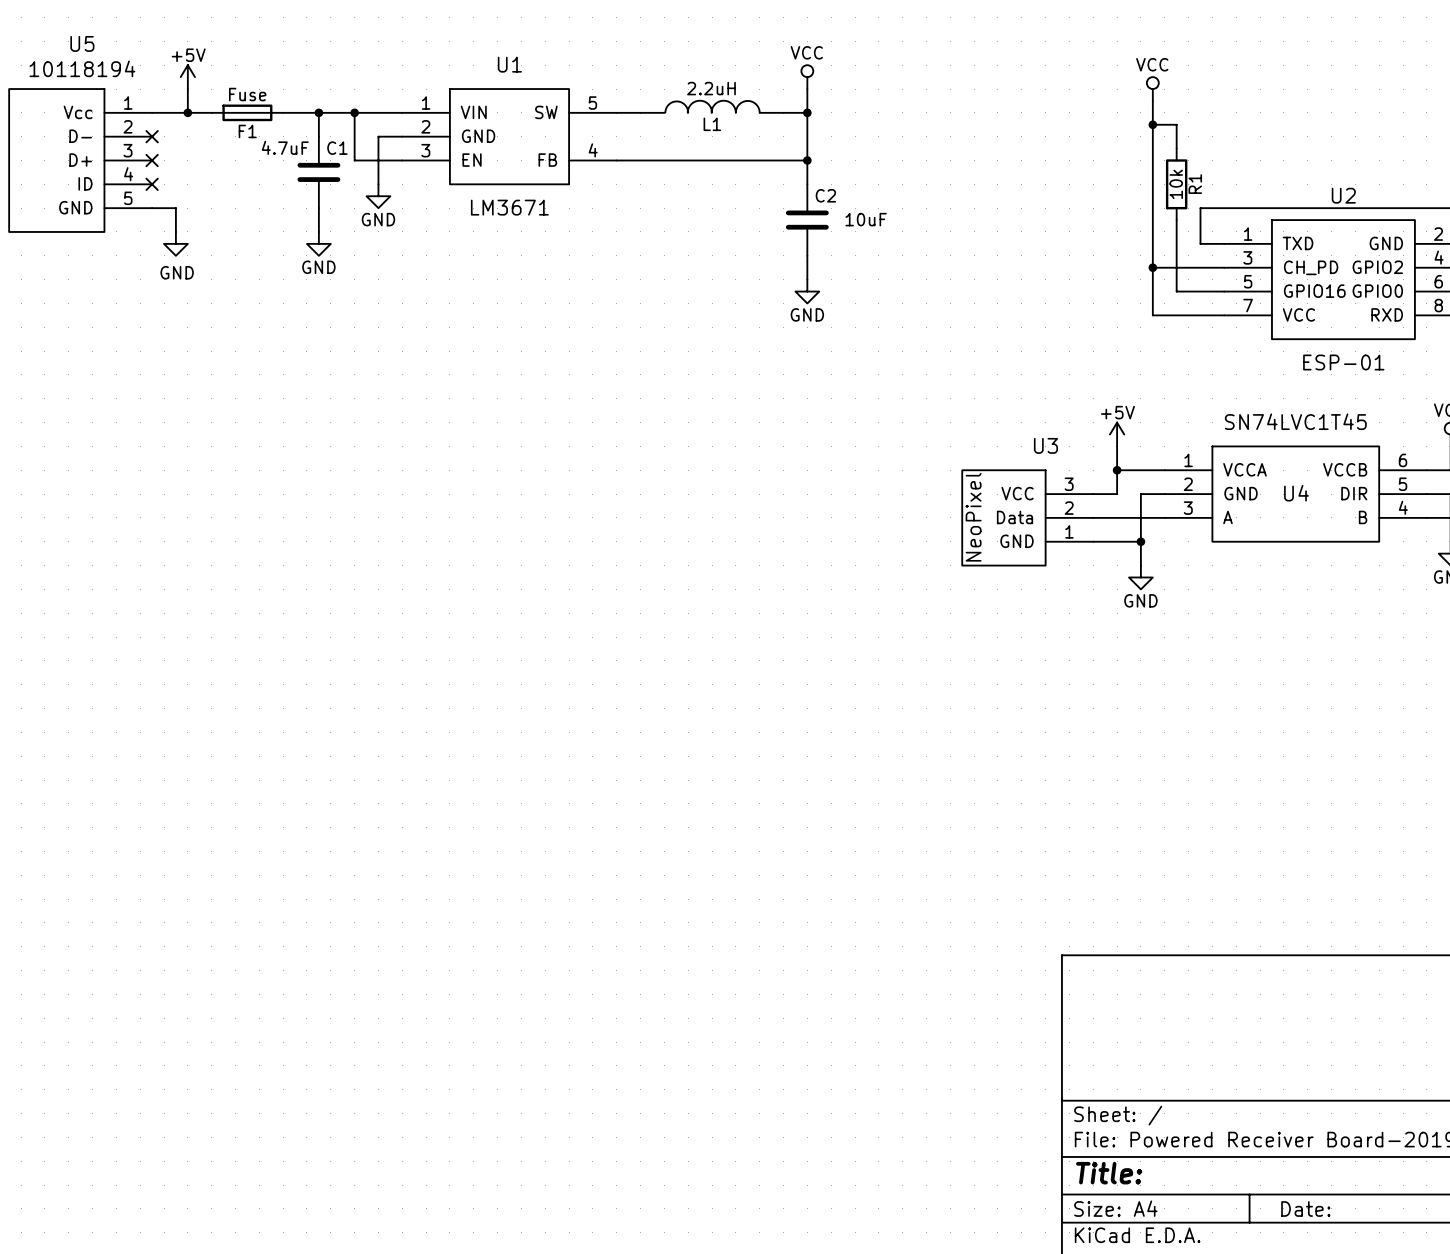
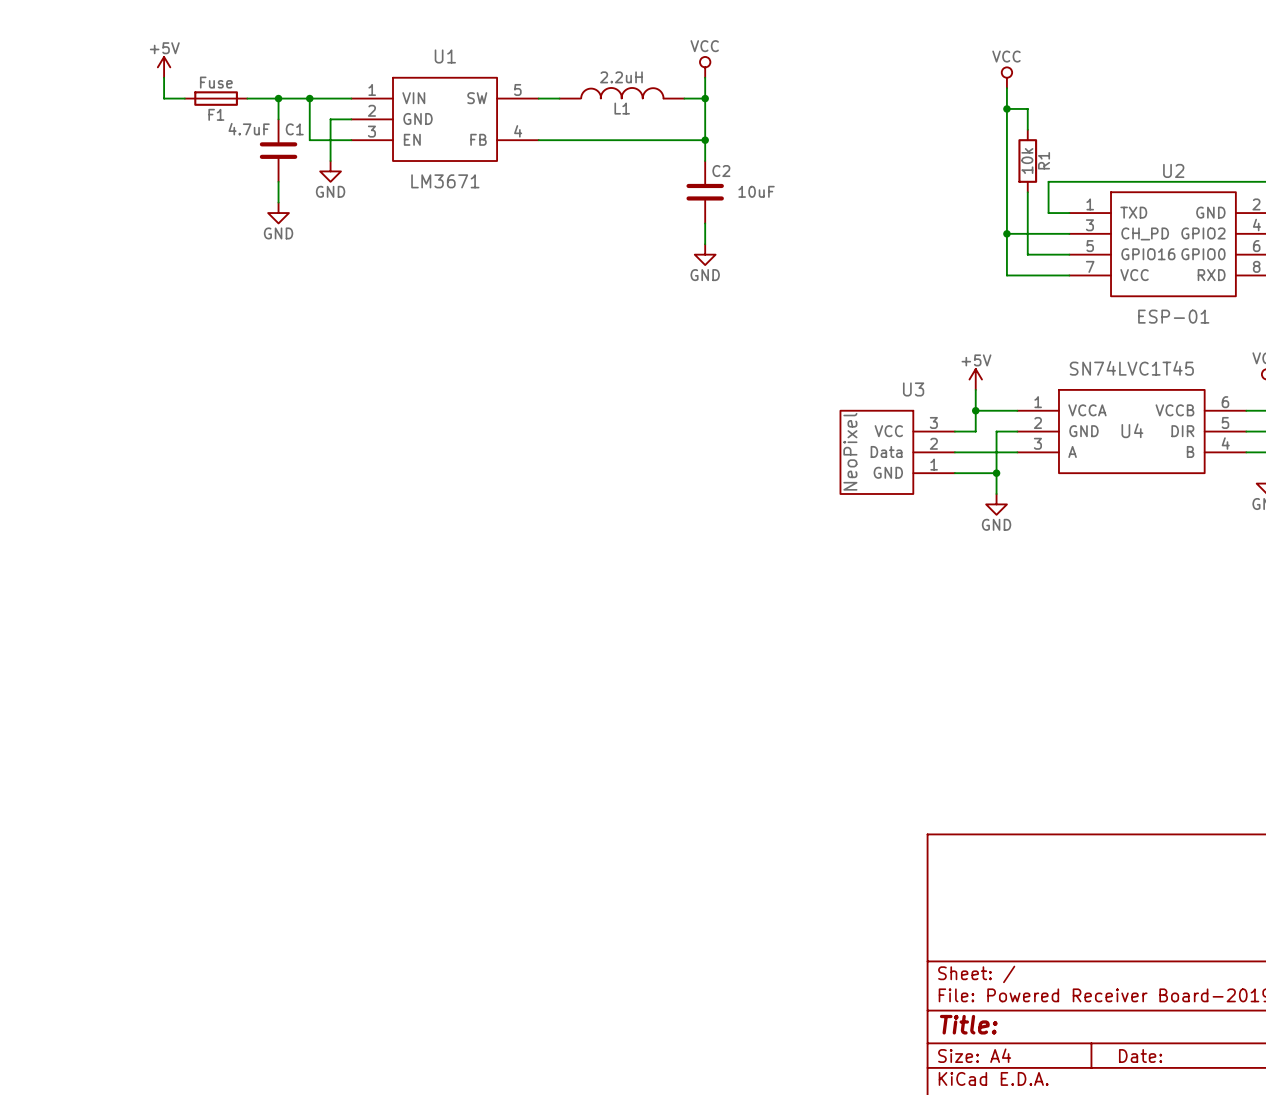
wire: (152, 112) (187, 112) -> none
junction: (187, 112) -> none
no-connect mark: (152, 136) -> none
U5: 10118194 (80, 160) -> none
no-connect mark: (152, 160) -> none
no-connect mark: (152, 184) -> none
wire: (152, 208) (175, 208) (175, 231) -> none
power symbol: GND (175, 243) -> none

